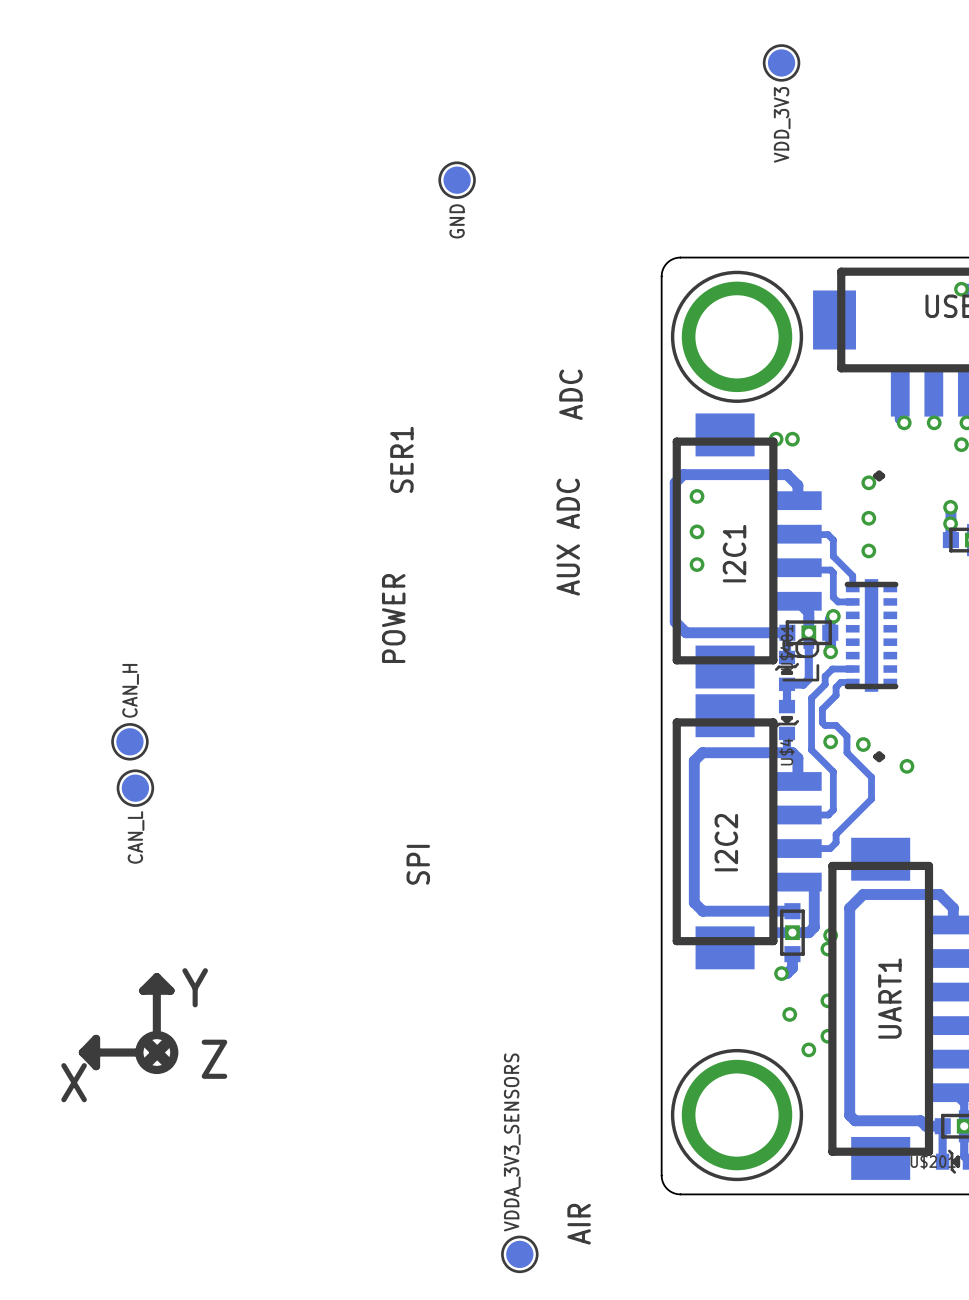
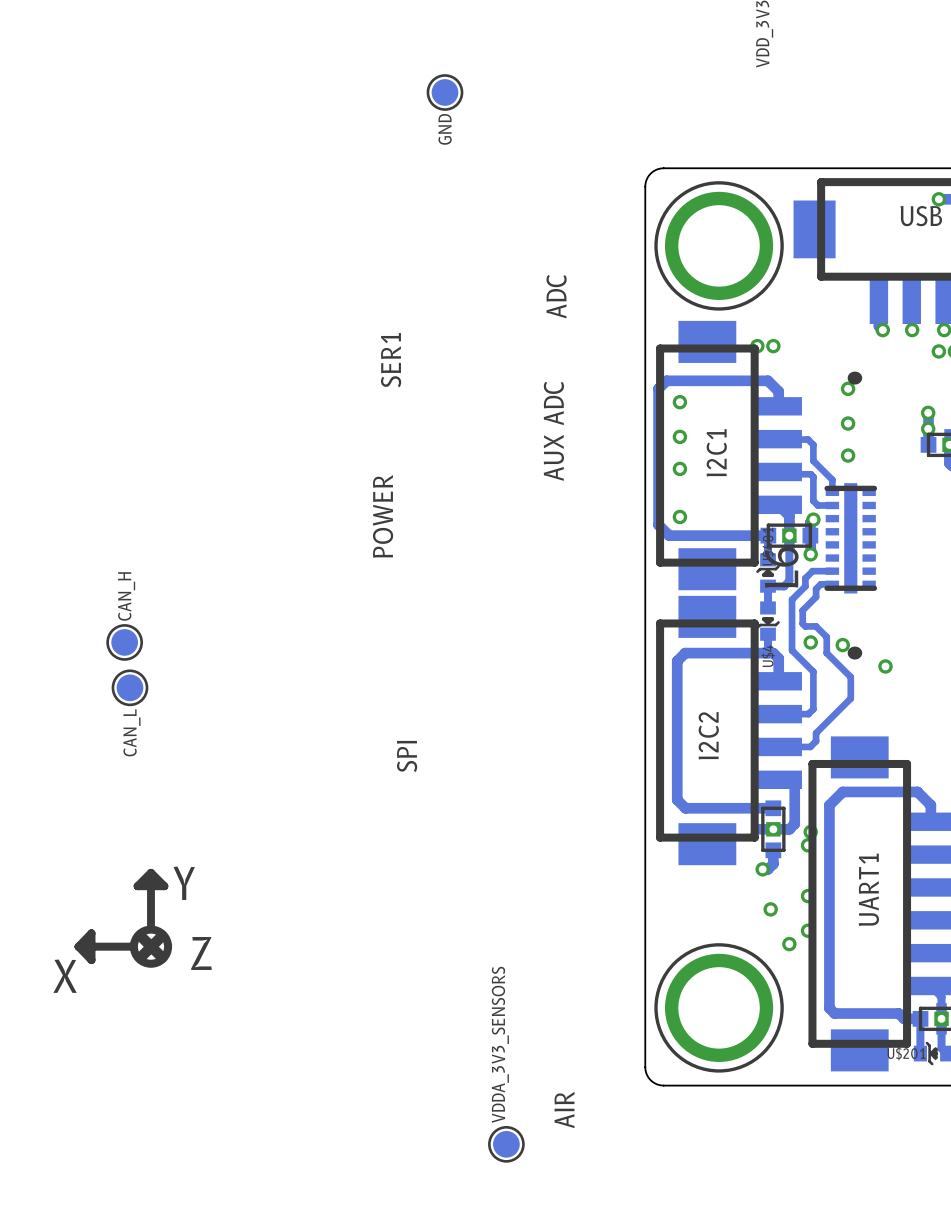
via: none -> (679, 516)

